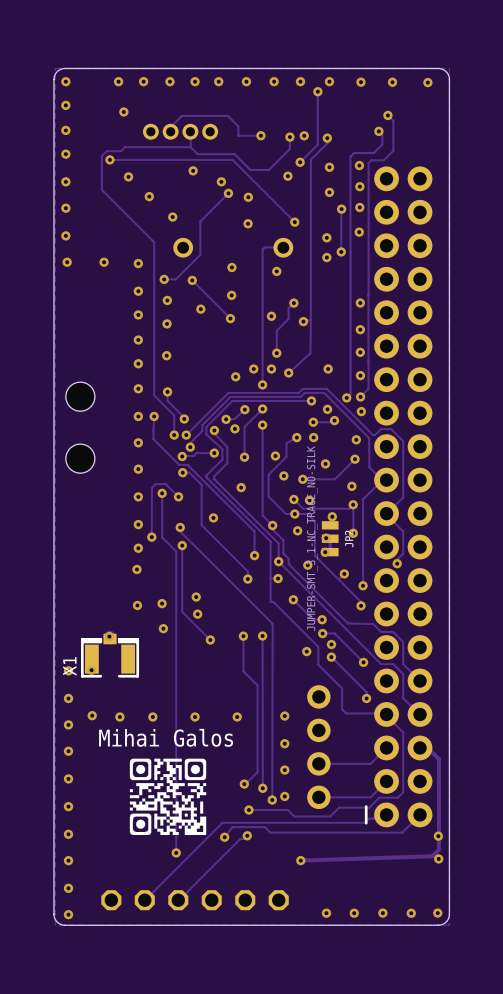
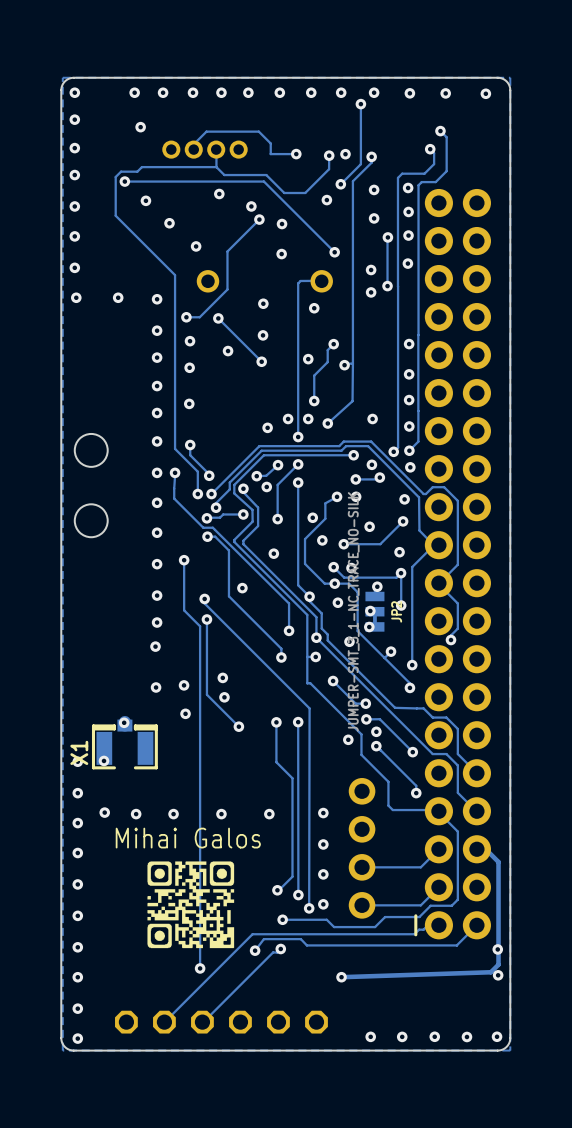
track: (177, 496) (165, 484) (155, 484) (151, 487) (151, 537) -> none
via: (178, 496) -> none
via: (151, 537) -> none

